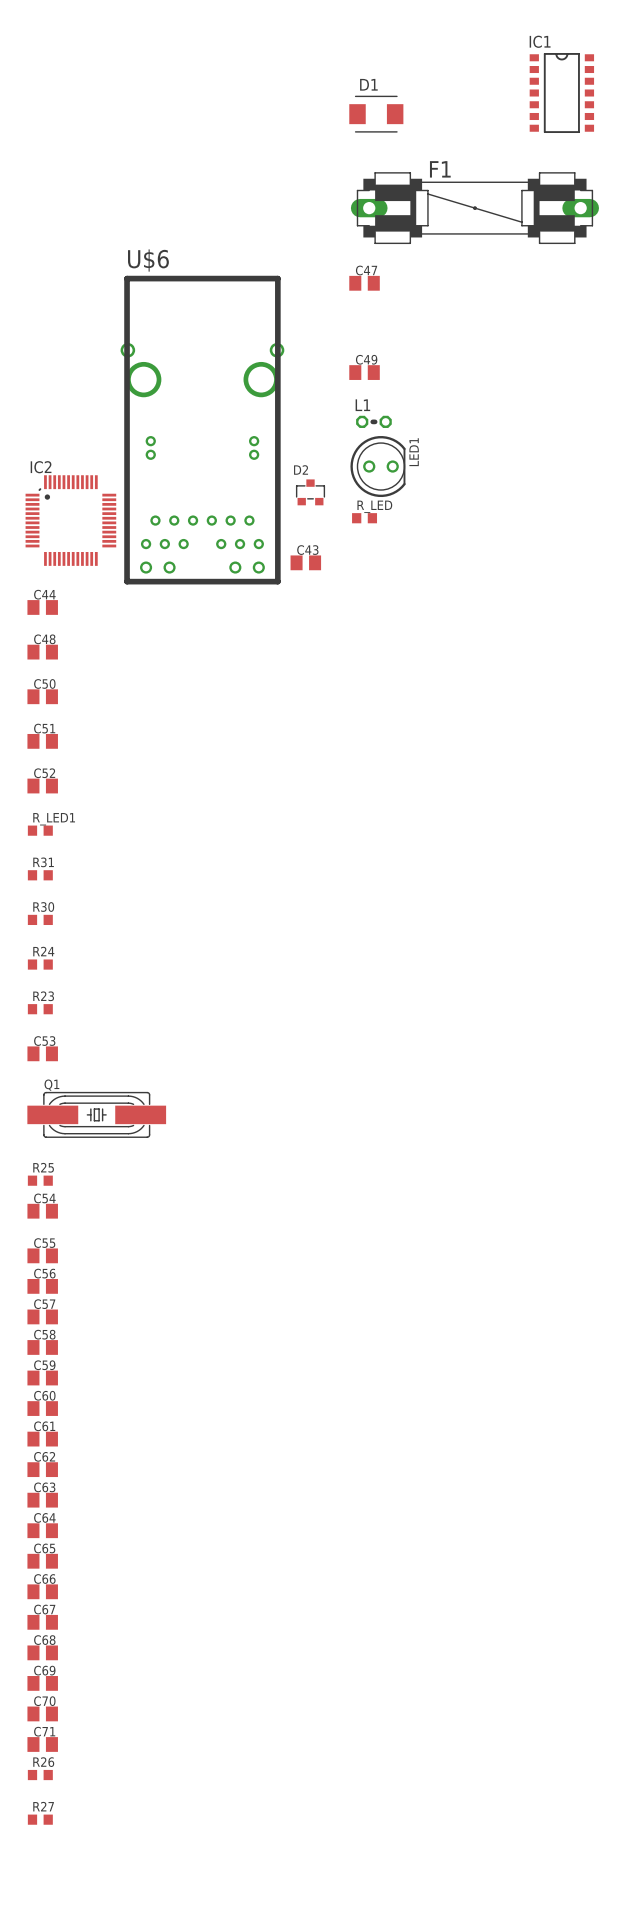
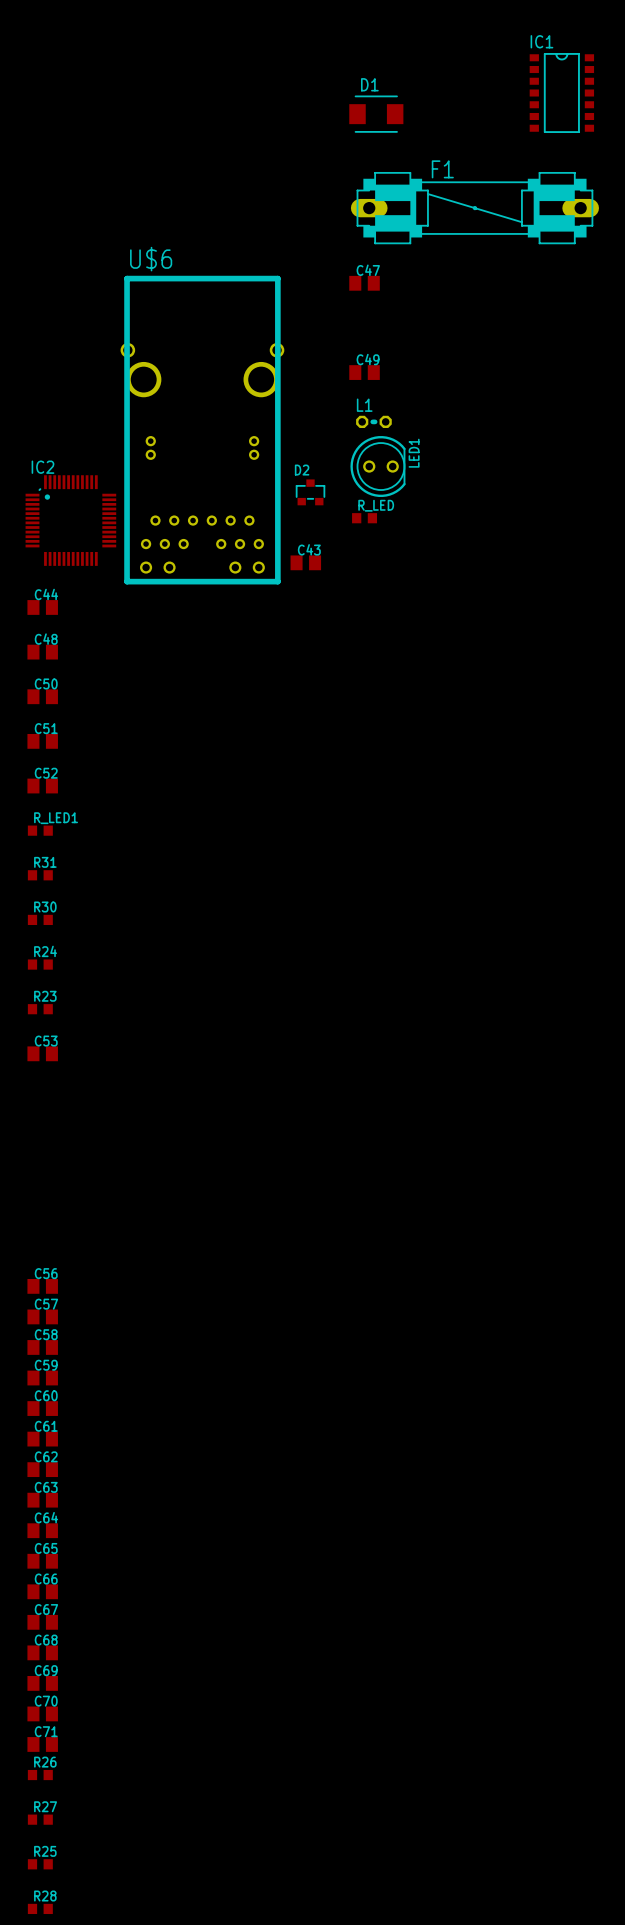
Q1: (96, 1114) -> none
R25 position: (40, 1180) -> (40, 1864)
C54: (42, 1211) -> none
C55: (42, 1255) -> none
R28: none -> (40, 1908)

